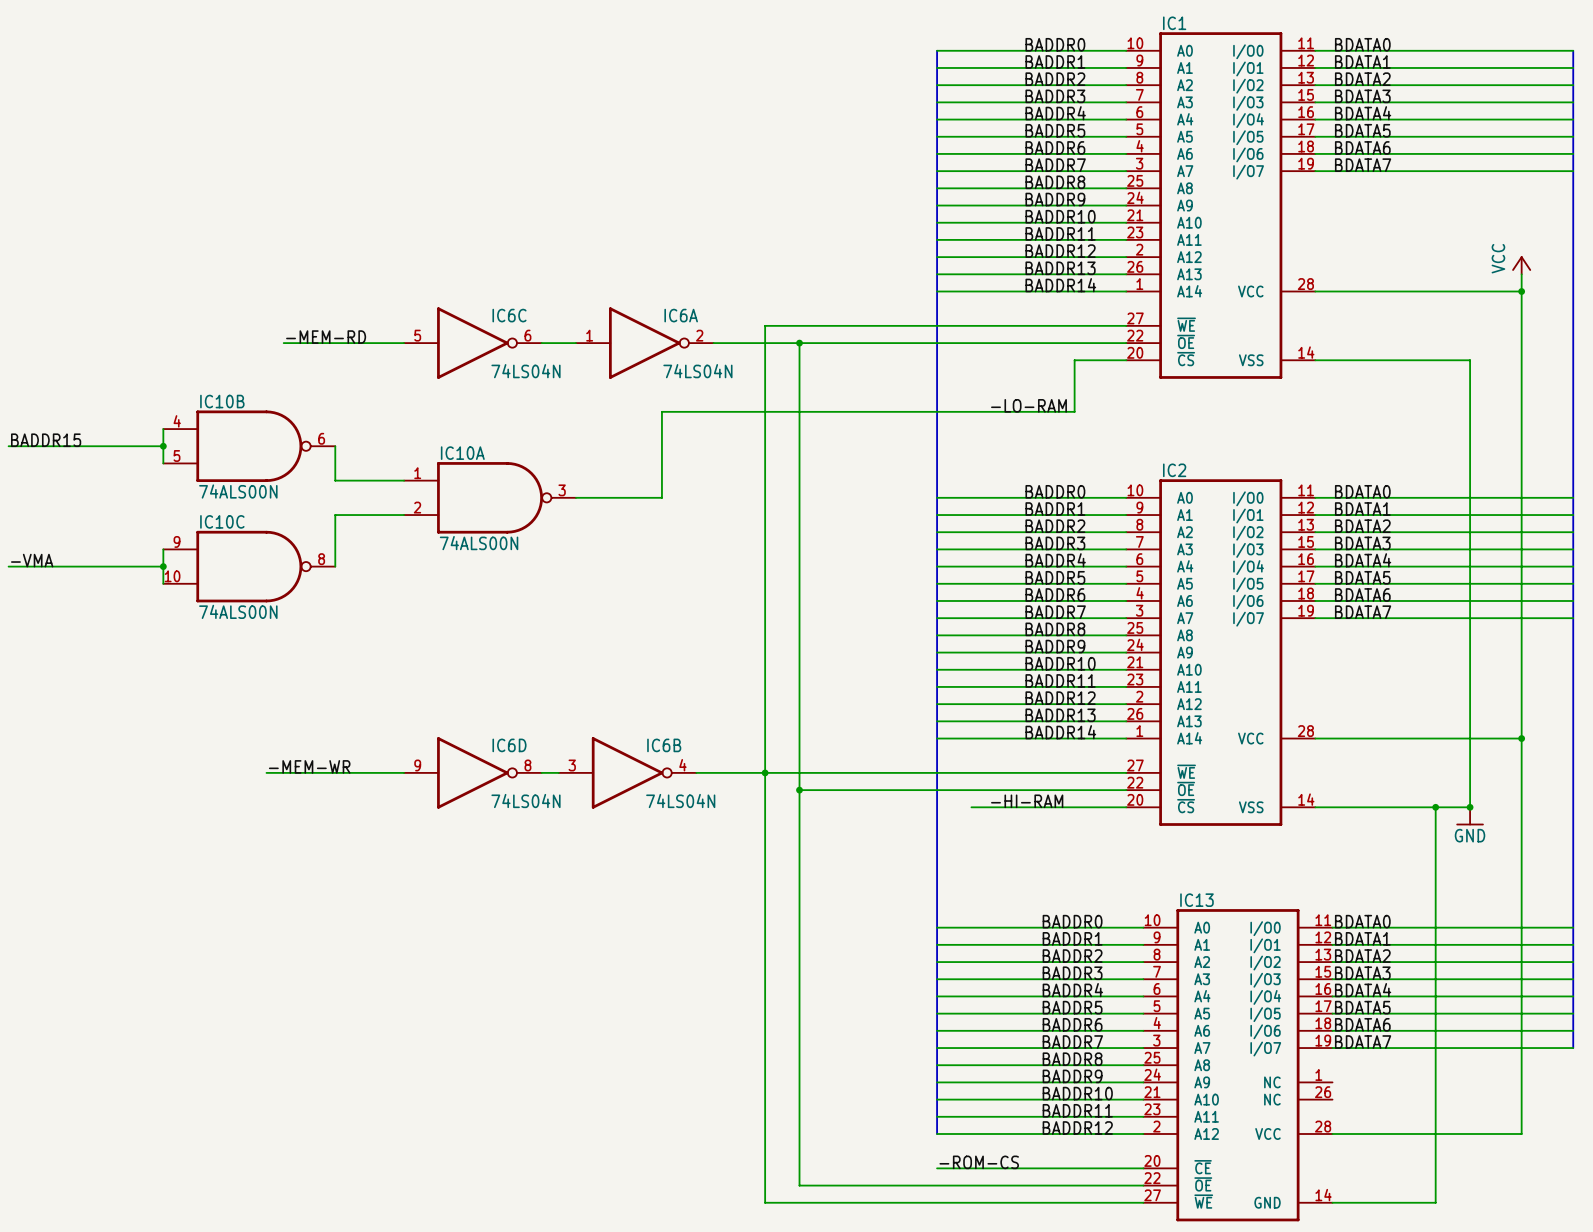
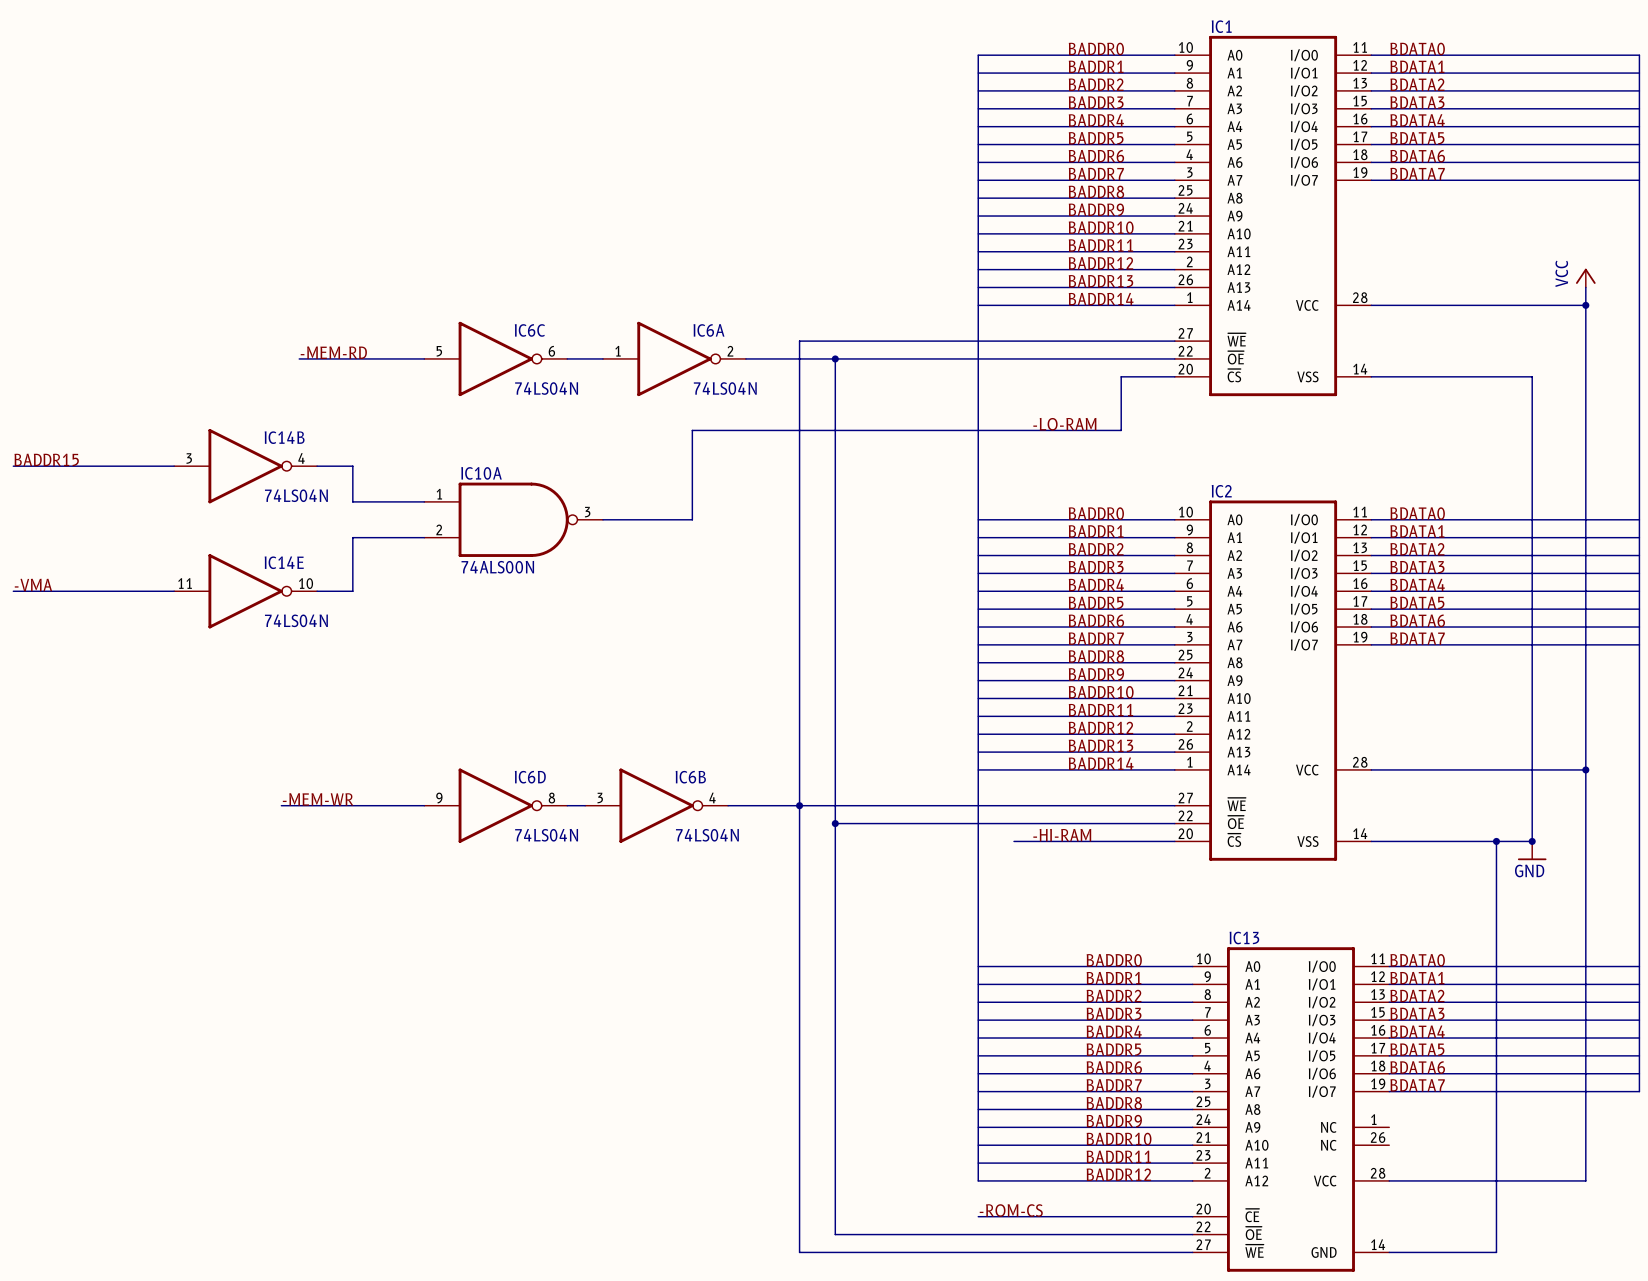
wire: (163, 429) (163, 463) -> none
junction: (163, 446) -> none
IC14B: none -> 74LS04N (245, 466)
IC10B: 74ALS00N (249, 446) -> none
wire: (163, 549) (163, 583) -> none
junction: (163, 566) -> none
IC14E: none -> 74LS04N (245, 591)
IC10C: 74ALS00N (249, 566) -> none

